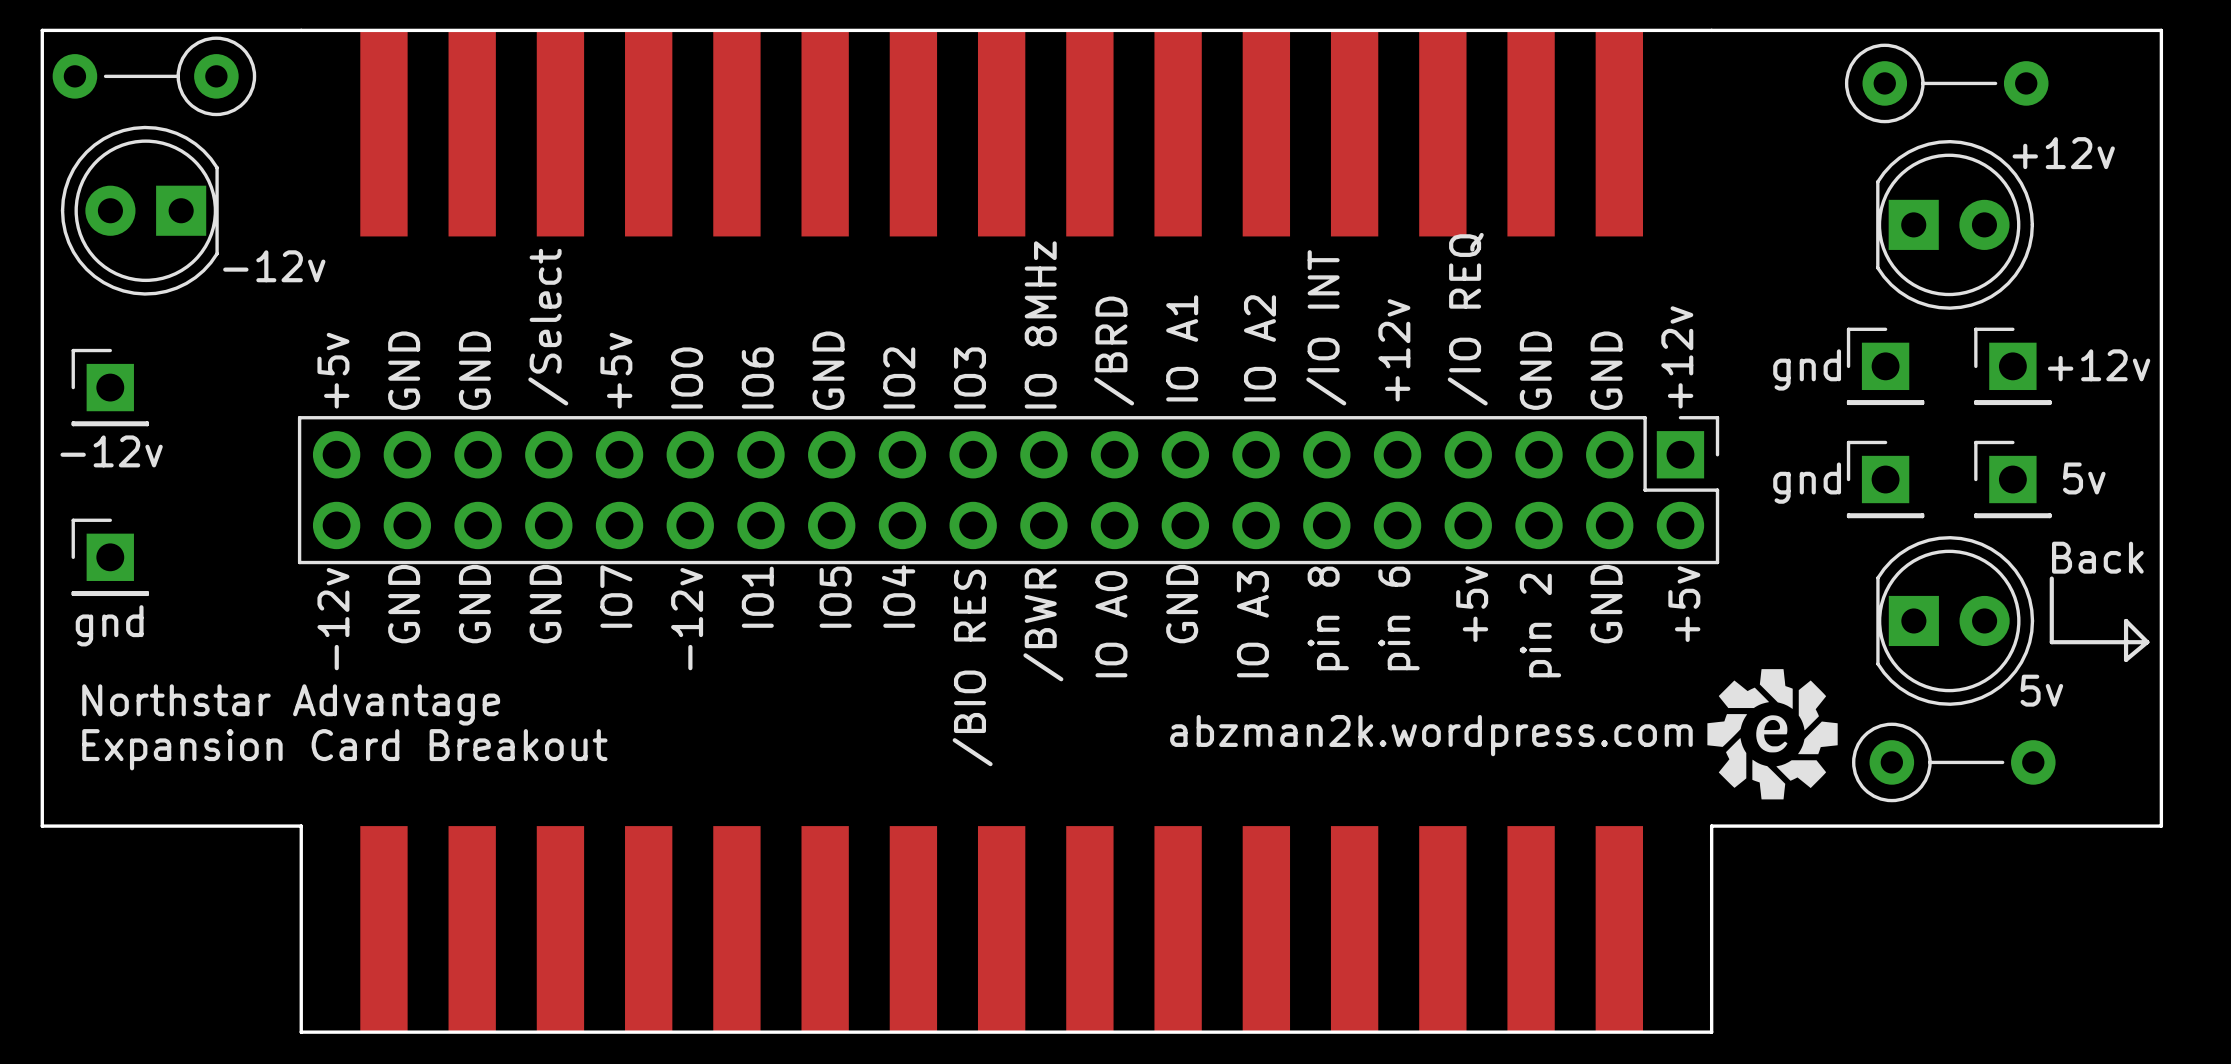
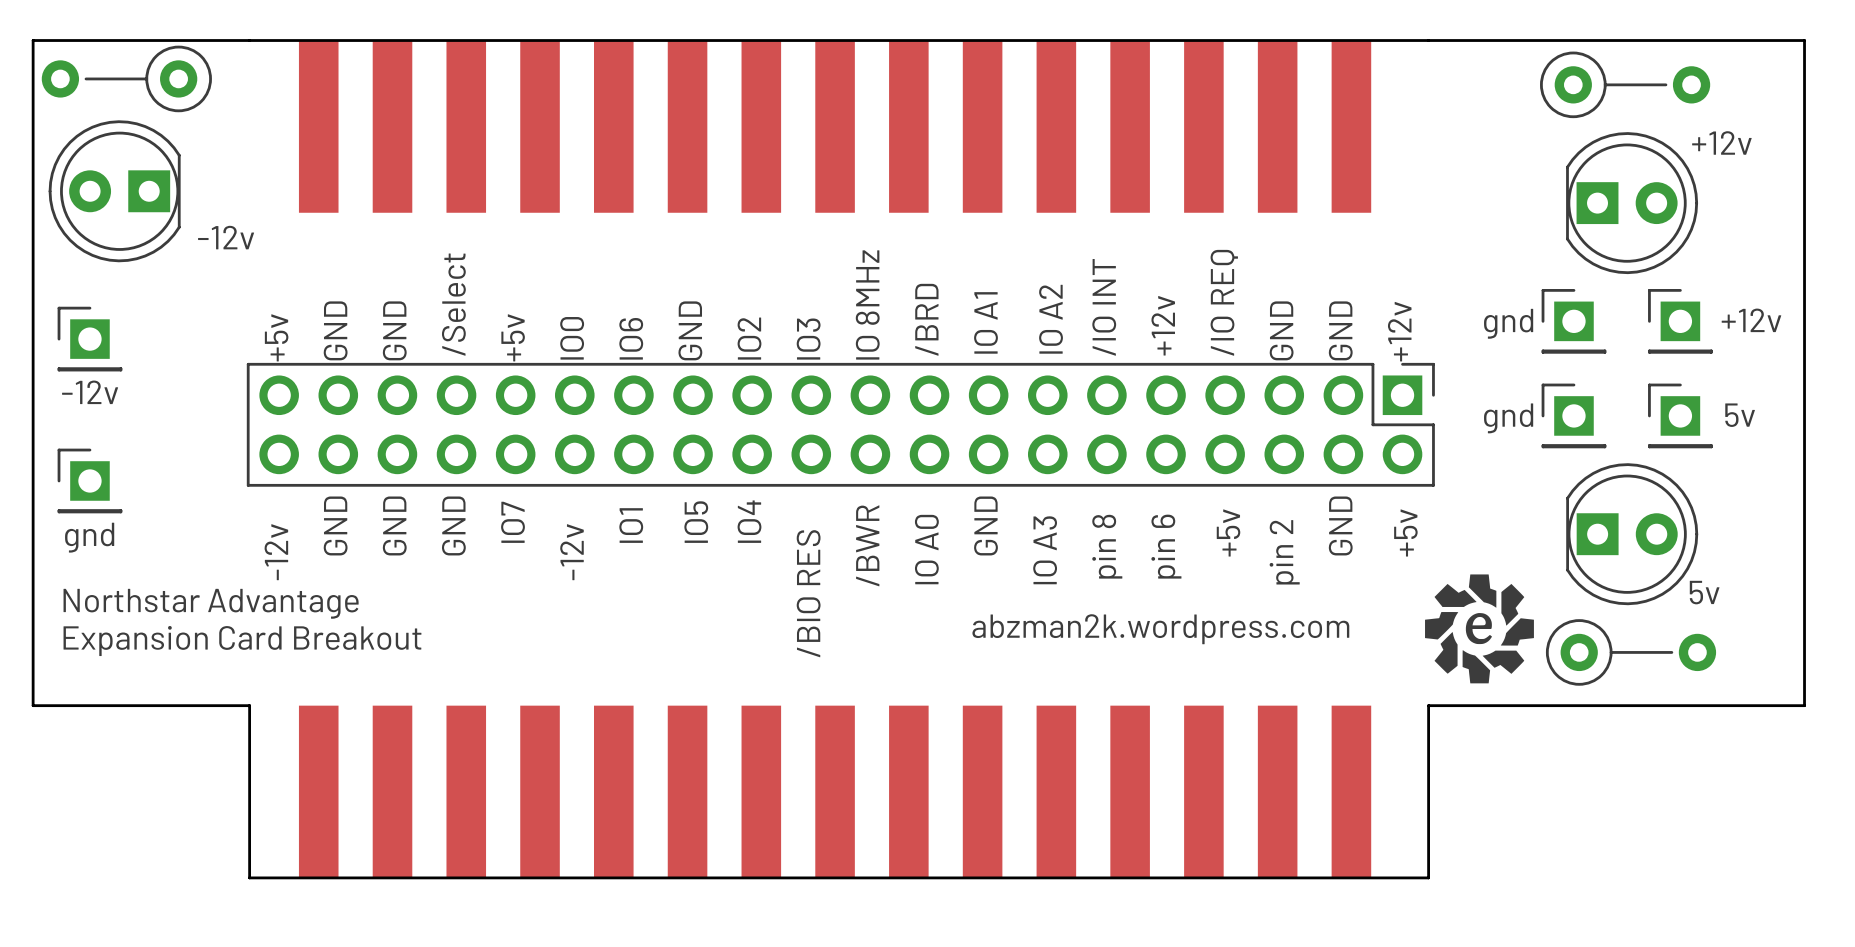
text: Back (2097, 557) -> none
line: (2051, 578) (2051, 642) (2147, 642) -> none
line: (2147, 642) (2126, 659) (2126, 620) (2147, 642) -> none

